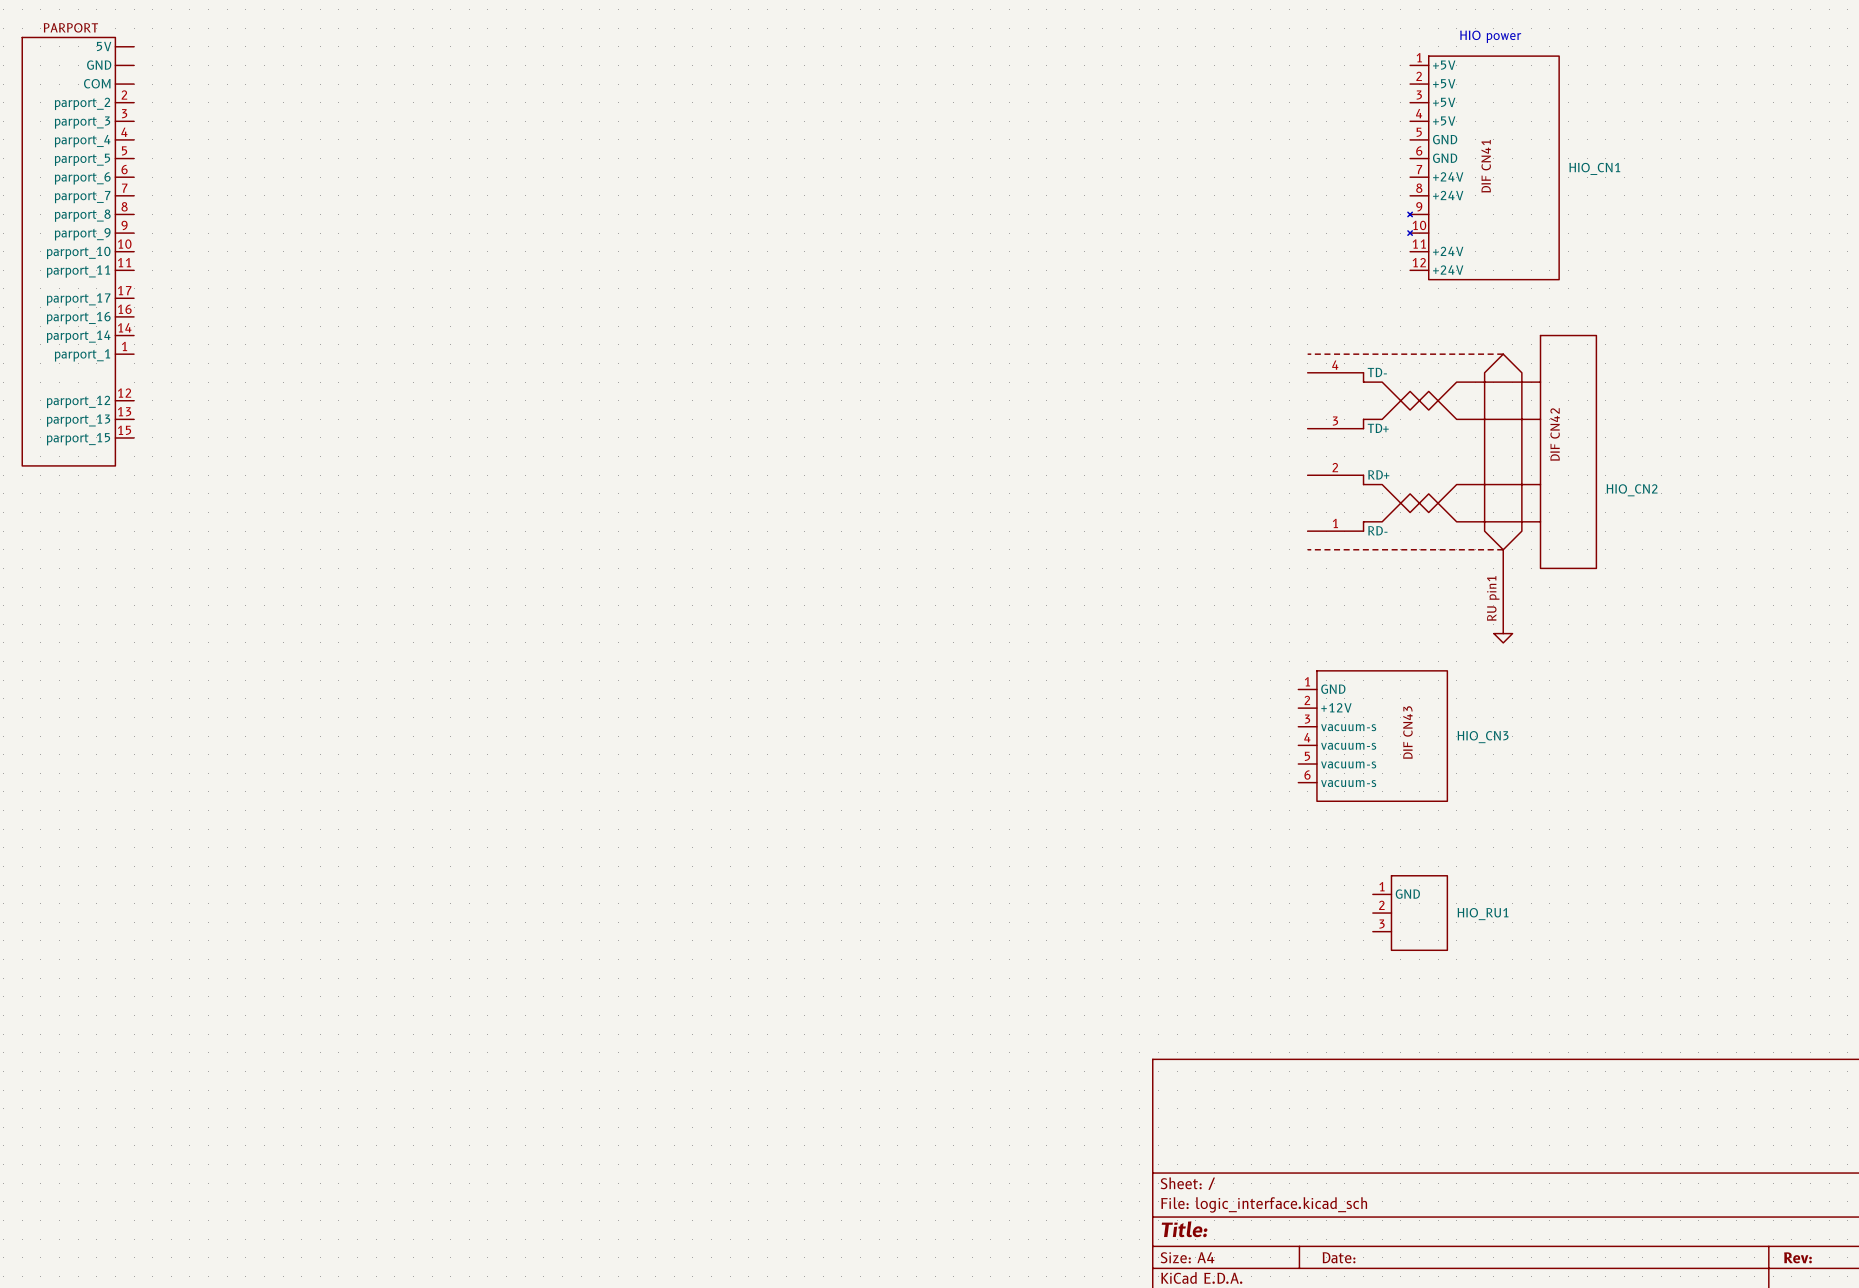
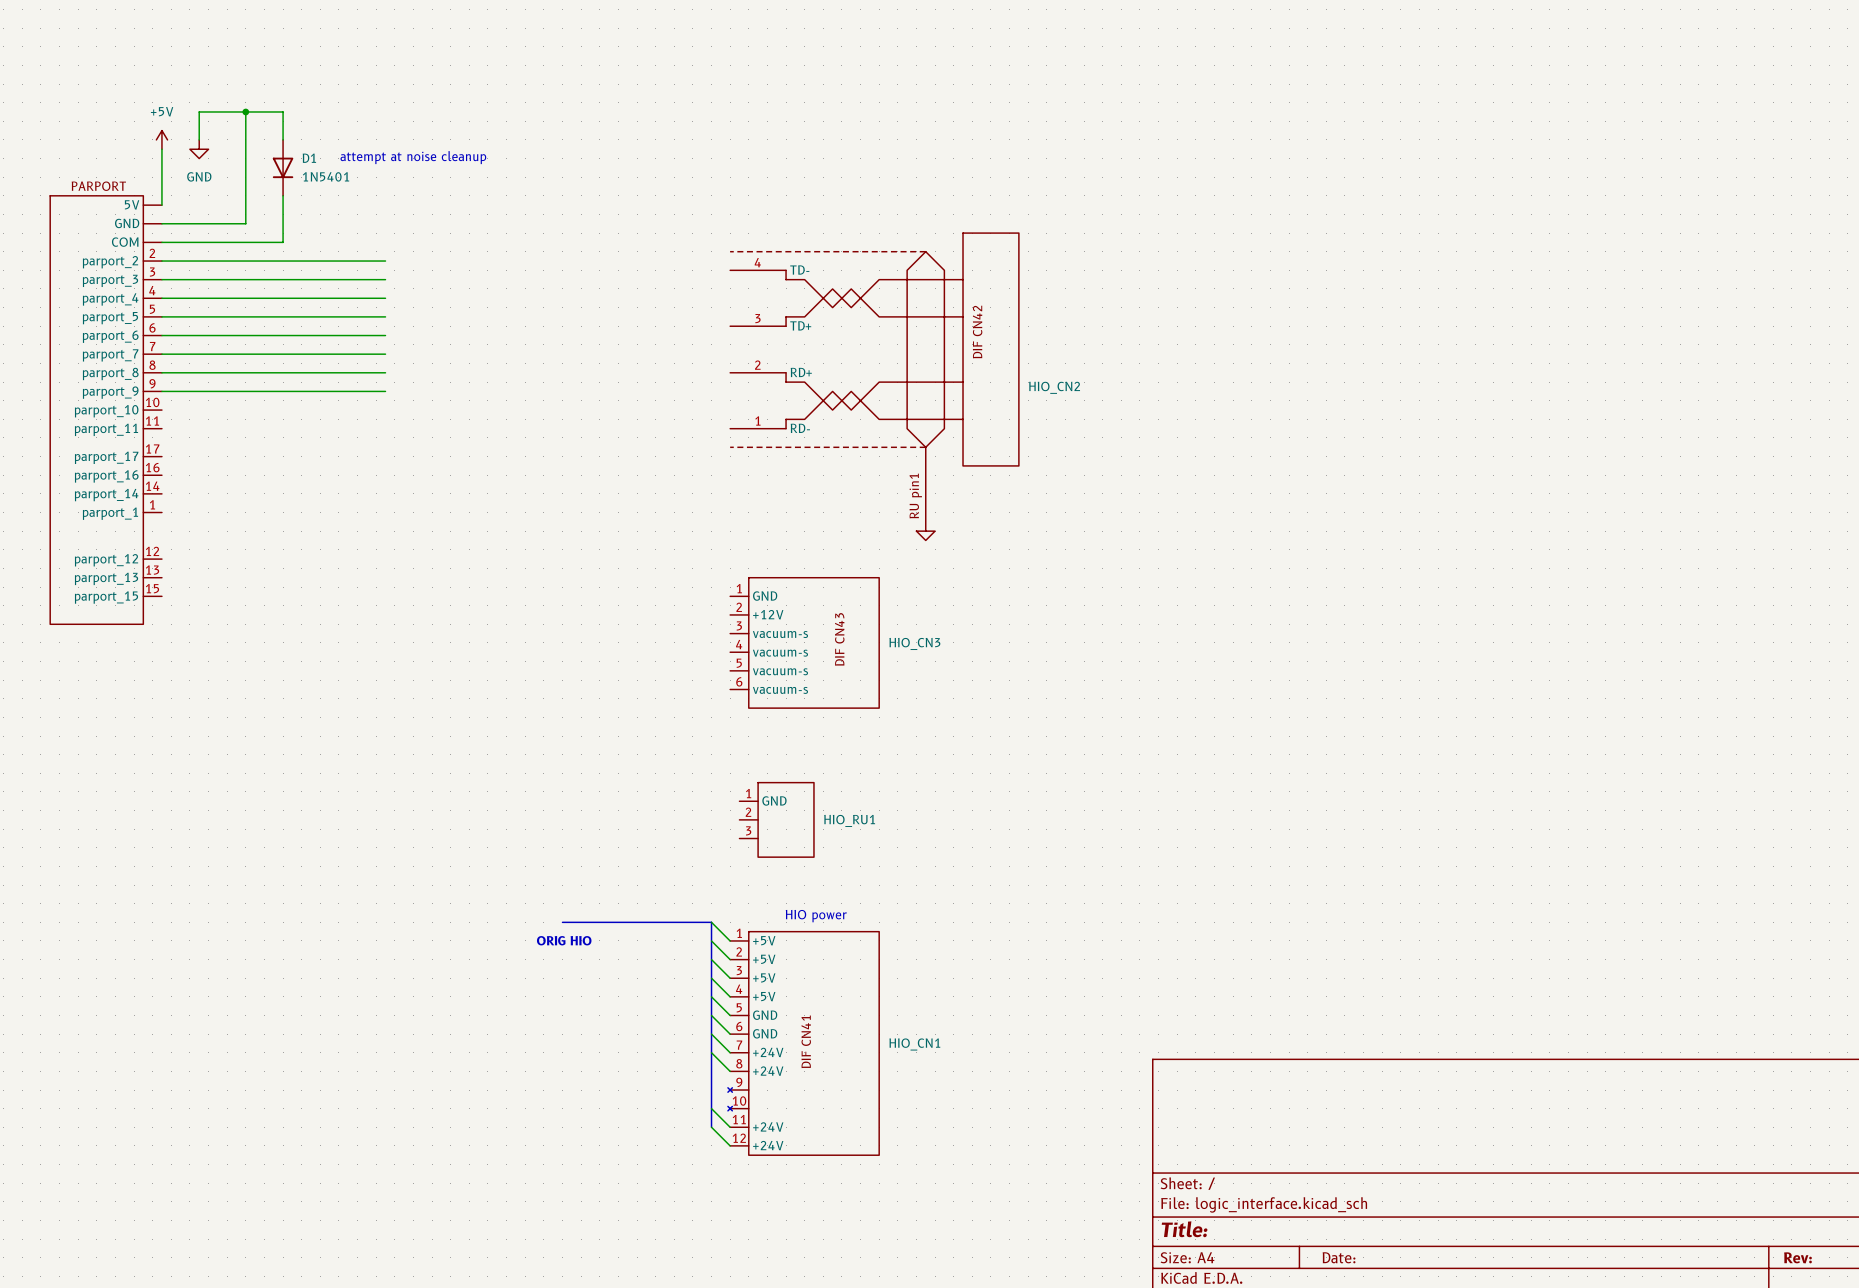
text: HIO power (1490, 36) -> none
wire: none -> (245, 111) (245, 223) (161, 223)
junction: none -> (245, 111)
power symbol: none -> +5V (161, 139)
wire: none -> (199, 139) (199, 111) (283, 111) (283, 139)
wire: none -> (161, 149) (161, 205)
power symbol: none -> GND (199, 149)
text: none -> attempt at noise cleanup (413, 157)
D1: none -> 1N5401 (283, 167)
HIO_CN1 position: (1483, 167) -> (803, 1043)
wire: none -> (283, 195) (283, 242) (161, 242)
part position: (78, 251) -> (106, 410)
wire: none -> (161, 261) (385, 261)
wire: none -> (161, 279) (385, 279)
wire: none -> (161, 298) (385, 298)
wire: none -> (161, 316) (385, 316)
wire: none -> (161, 335) (385, 335)
wire: none -> (161, 354) (385, 354)
wire: none -> (161, 372) (385, 372)
wire: none -> (161, 391) (385, 391)
HIO_CN2 position: (1452, 489) -> (874, 386)
HIO_CN3 position: (1372, 736) -> (804, 642)
HIO_RU1 position: (1410, 913) -> (776, 819)
text: none -> HIO power (816, 916)
bus: none -> (562, 922) (711, 922) (711, 1127)
wire: none -> (711, 922) (730, 940)
text: none -> ORIG HIO (564, 940)
wire: none -> (711, 940) (730, 959)
wire: none -> (711, 959) (730, 978)
wire: none -> (711, 978) (730, 996)
wire: none -> (711, 996) (730, 1015)
wire: none -> (711, 1015) (730, 1034)
wire: none -> (711, 1034) (730, 1052)
wire: none -> (711, 1052) (730, 1071)
wire: none -> (711, 1108) (730, 1127)
wire: none -> (711, 1127) (730, 1145)

